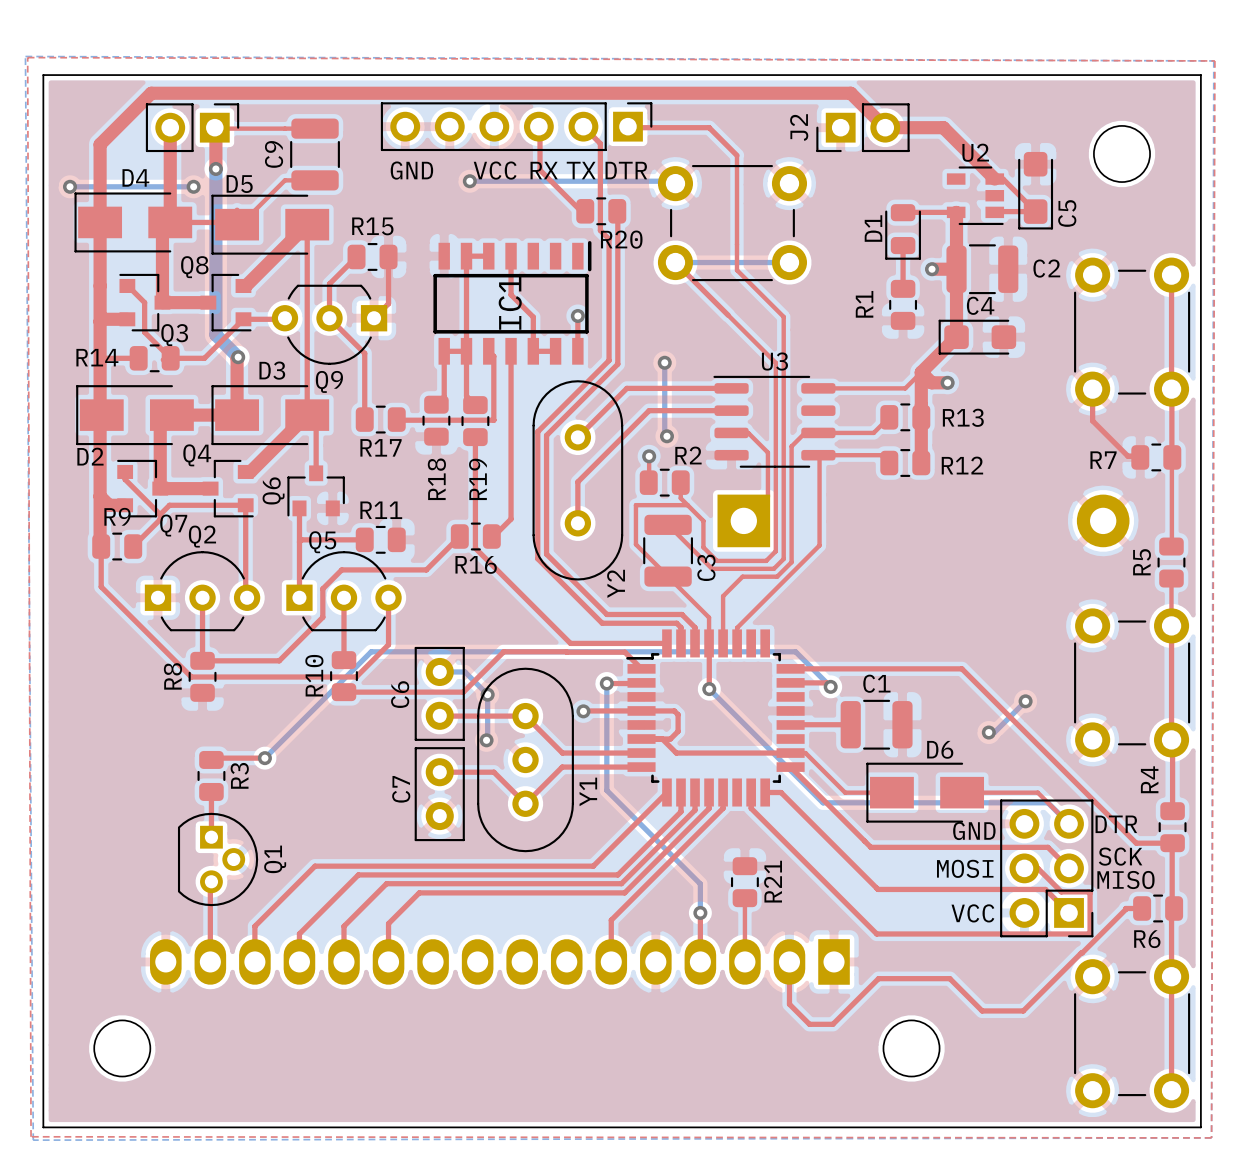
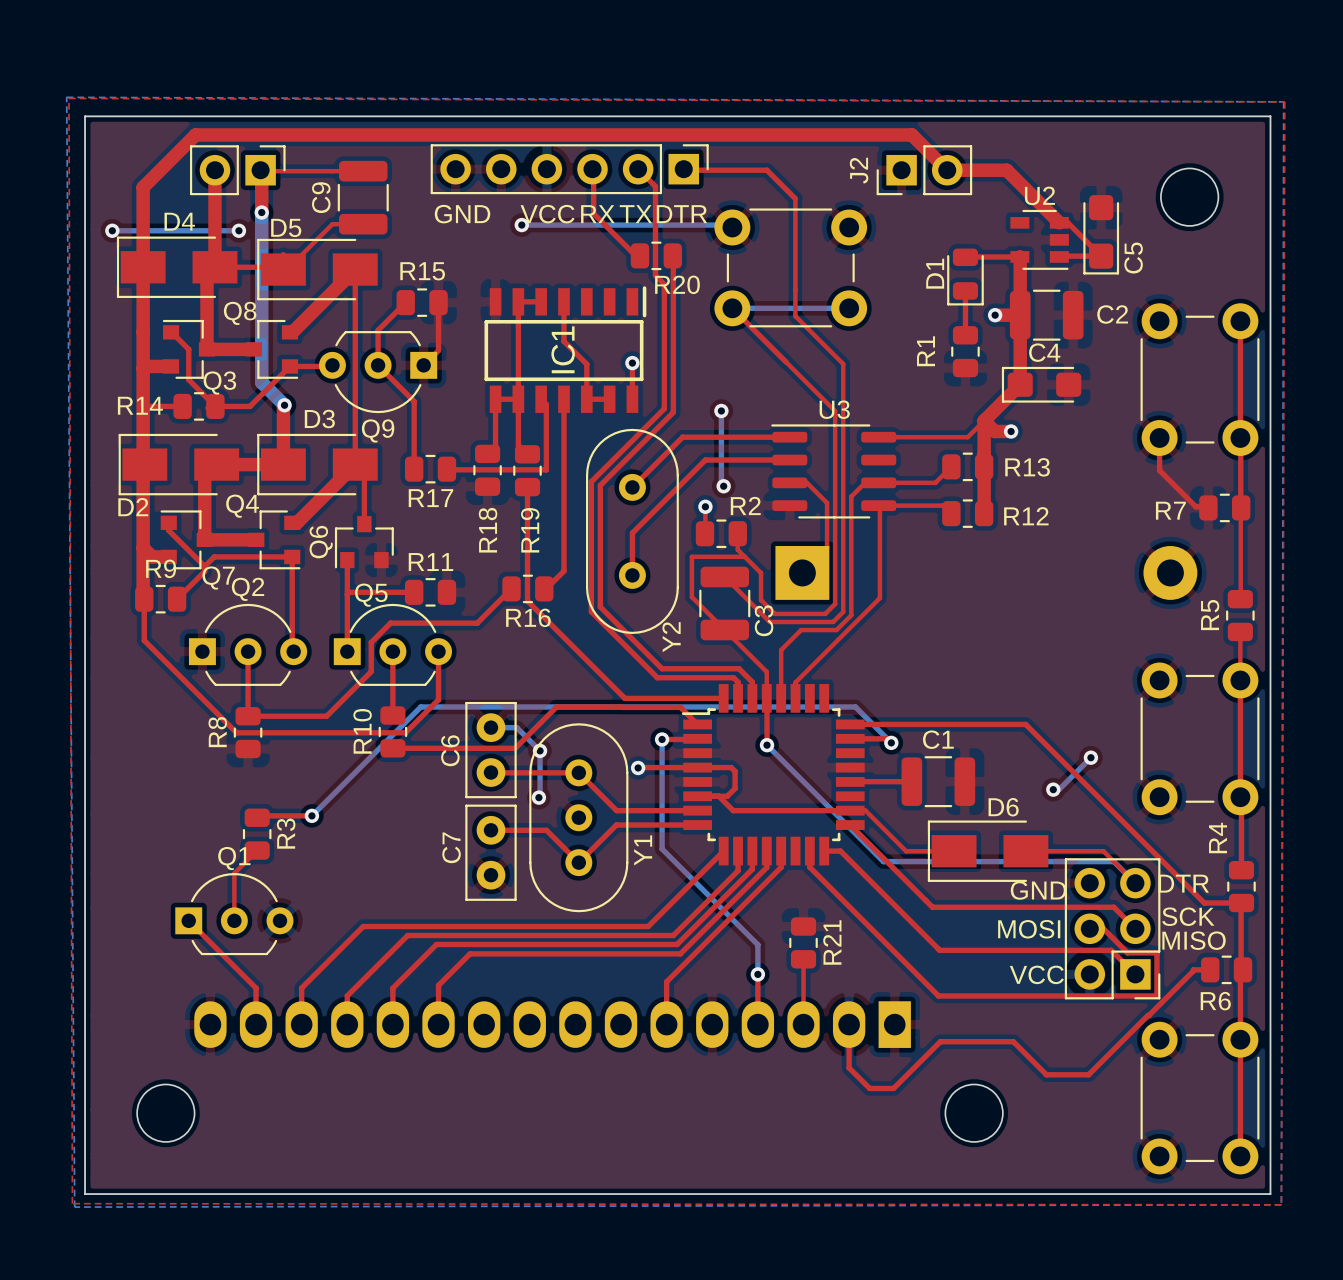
top track: (211, 791) (211, 837) -> (257, 850) (234, 873) (234, 920)
Q1 footprint: [177, 812, 259, 907] -> [175, 873, 294, 956]
Q1 name position: Q1 (275, 859) -> Q1 (234, 858)
top track: (211, 881) (210, 926) -> (188, 920) (256, 988)

